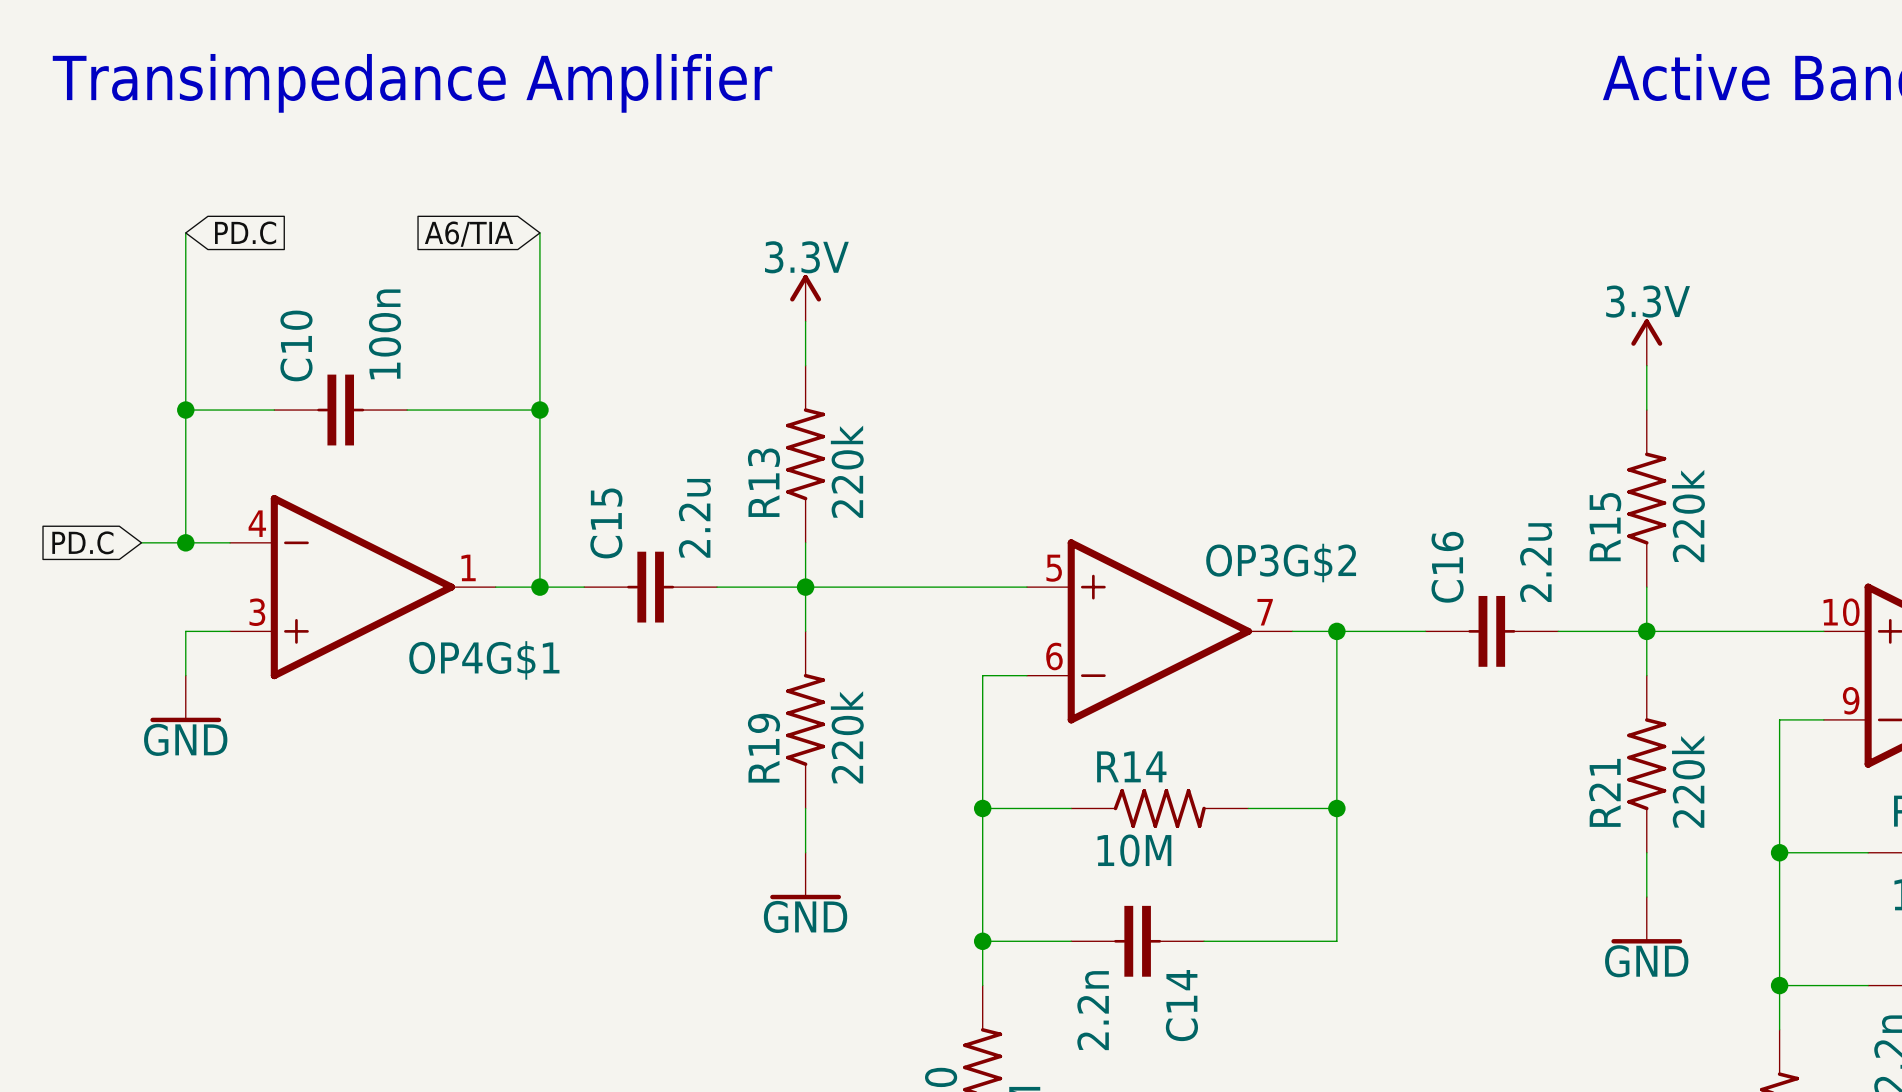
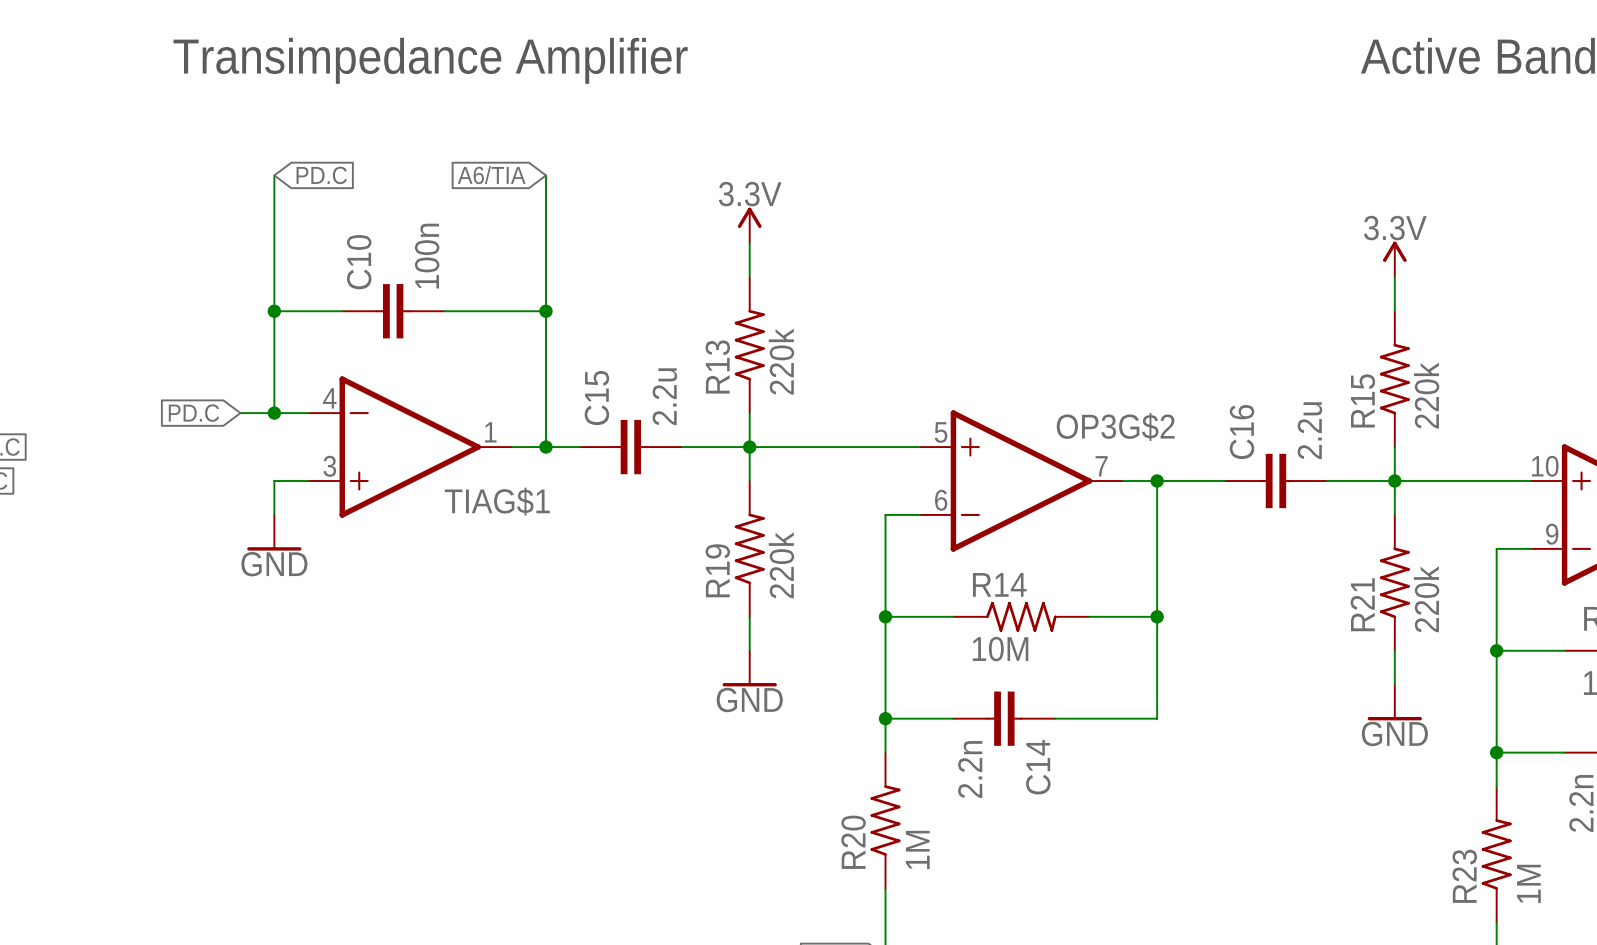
OP4G$1 name: OP4G$1 (484, 660) -> TIAG$1 (497, 501)

